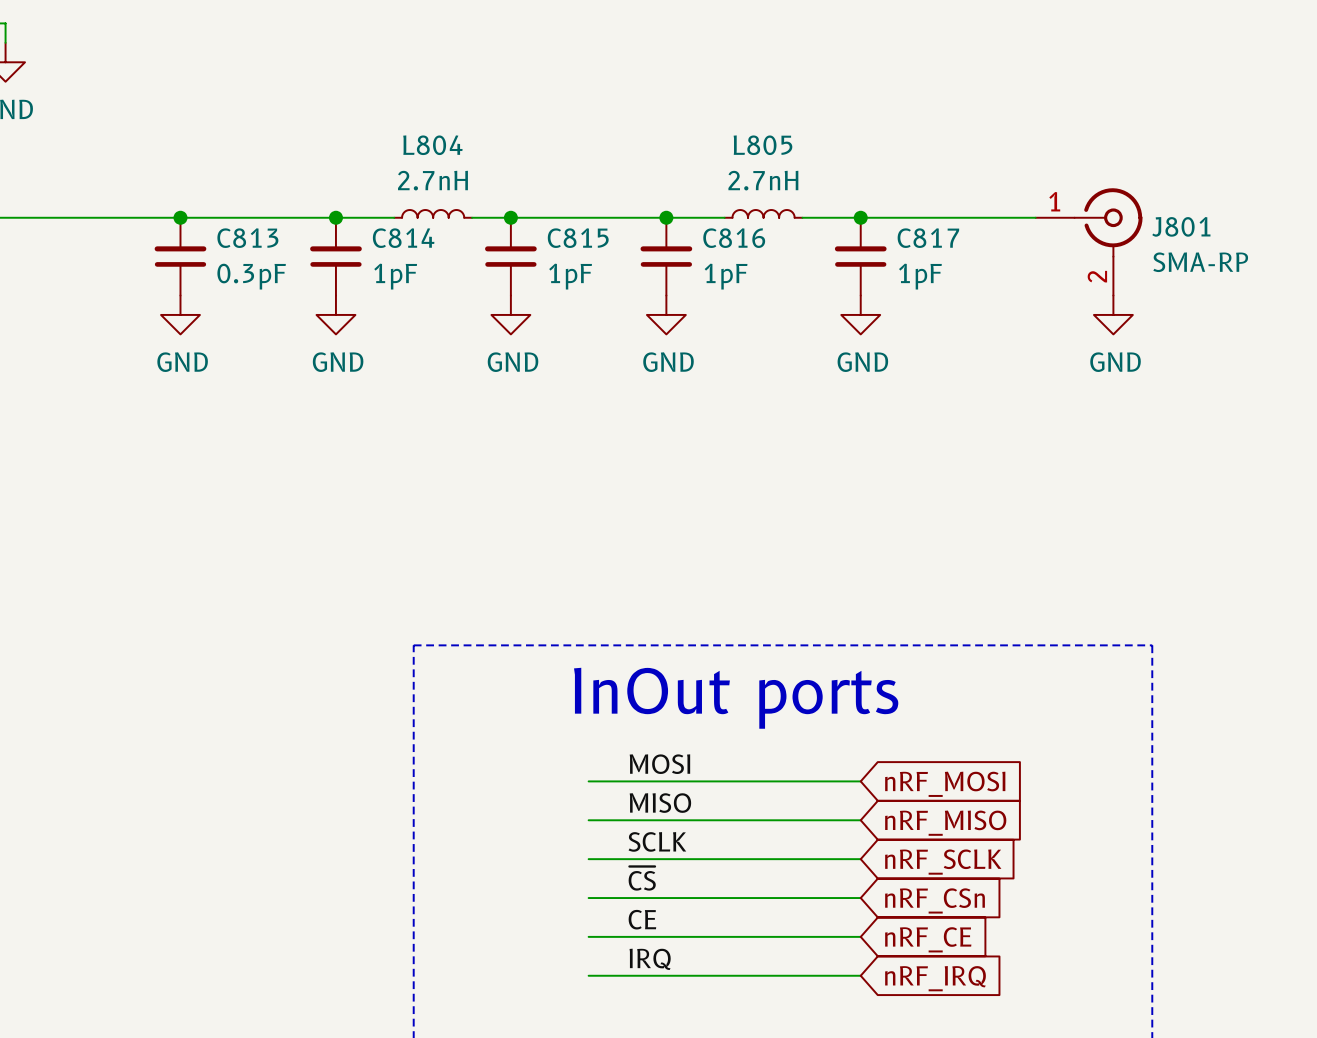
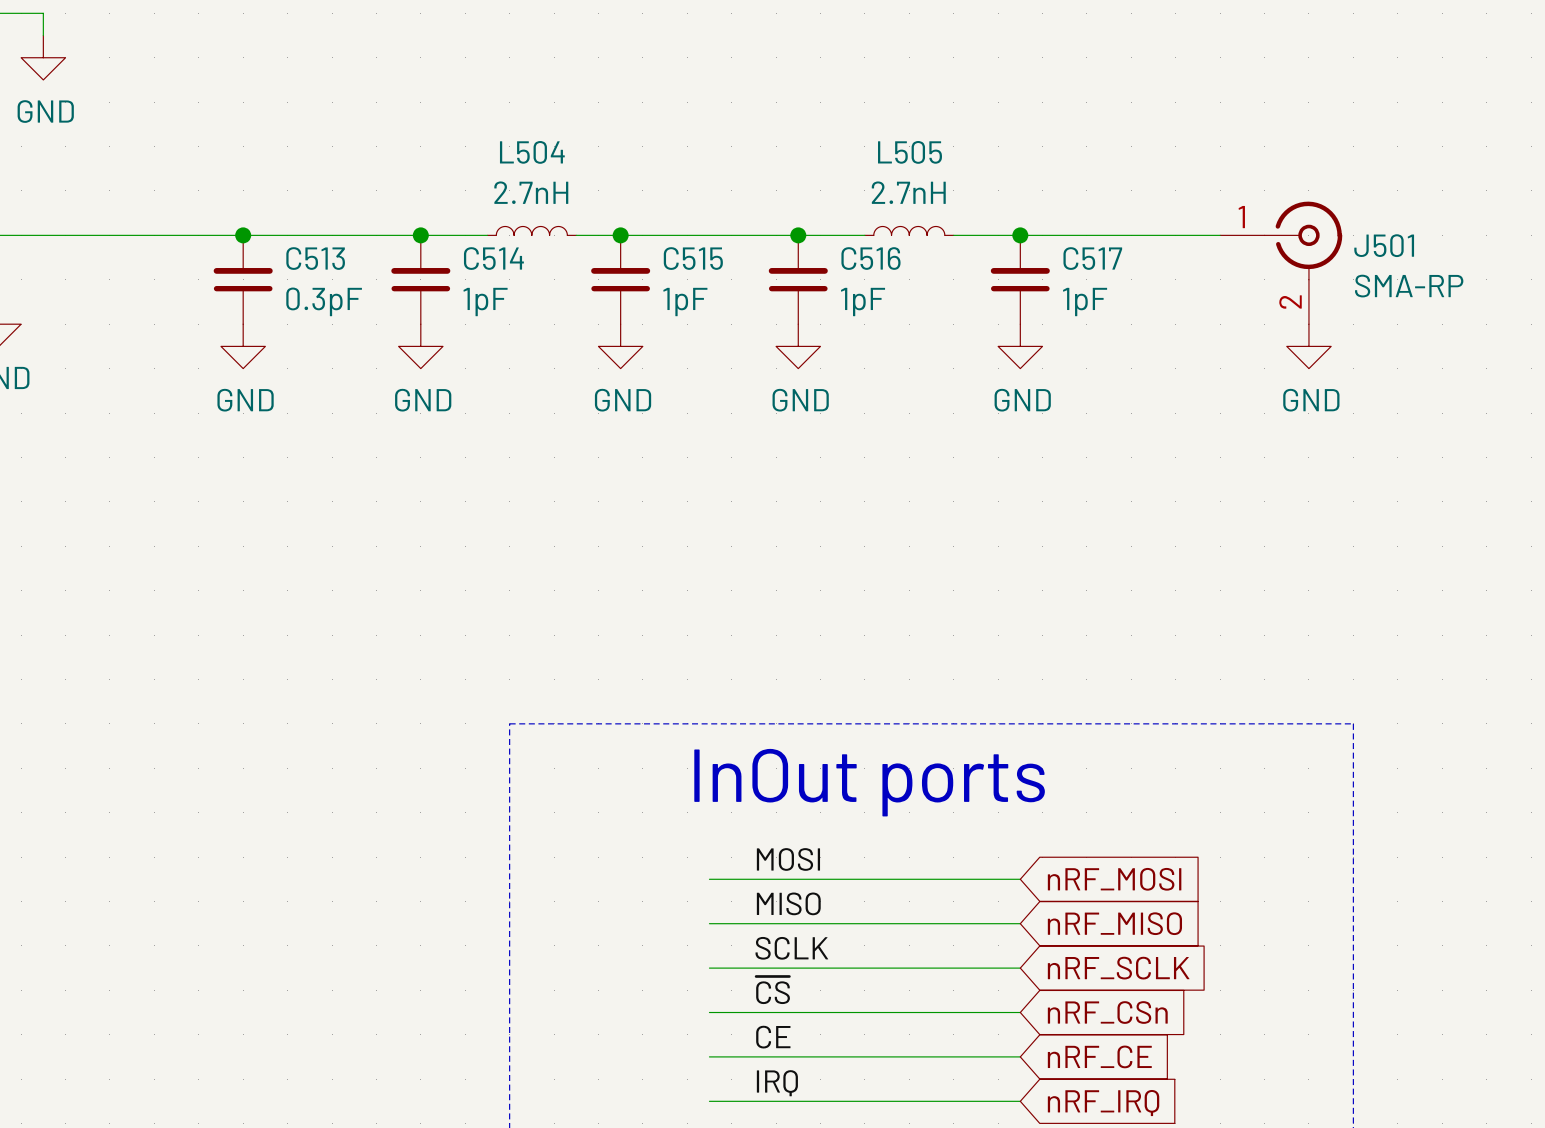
L804 name: L804 (432, 145) -> L504 (532, 152)
L805 name: L805 (762, 145) -> L505 (910, 152)
J801 name: J801 (1181, 226) -> J501 (1384, 245)
C813 name: C813 (247, 238) -> C513 (315, 258)
C814 name: C814 (403, 238) -> C514 (493, 258)
C815 name: C815 (578, 238) -> C515 (693, 258)
C816 name: C816 (734, 238) -> C516 (870, 258)
C817 name: C817 (928, 238) -> C517 (1092, 258)

